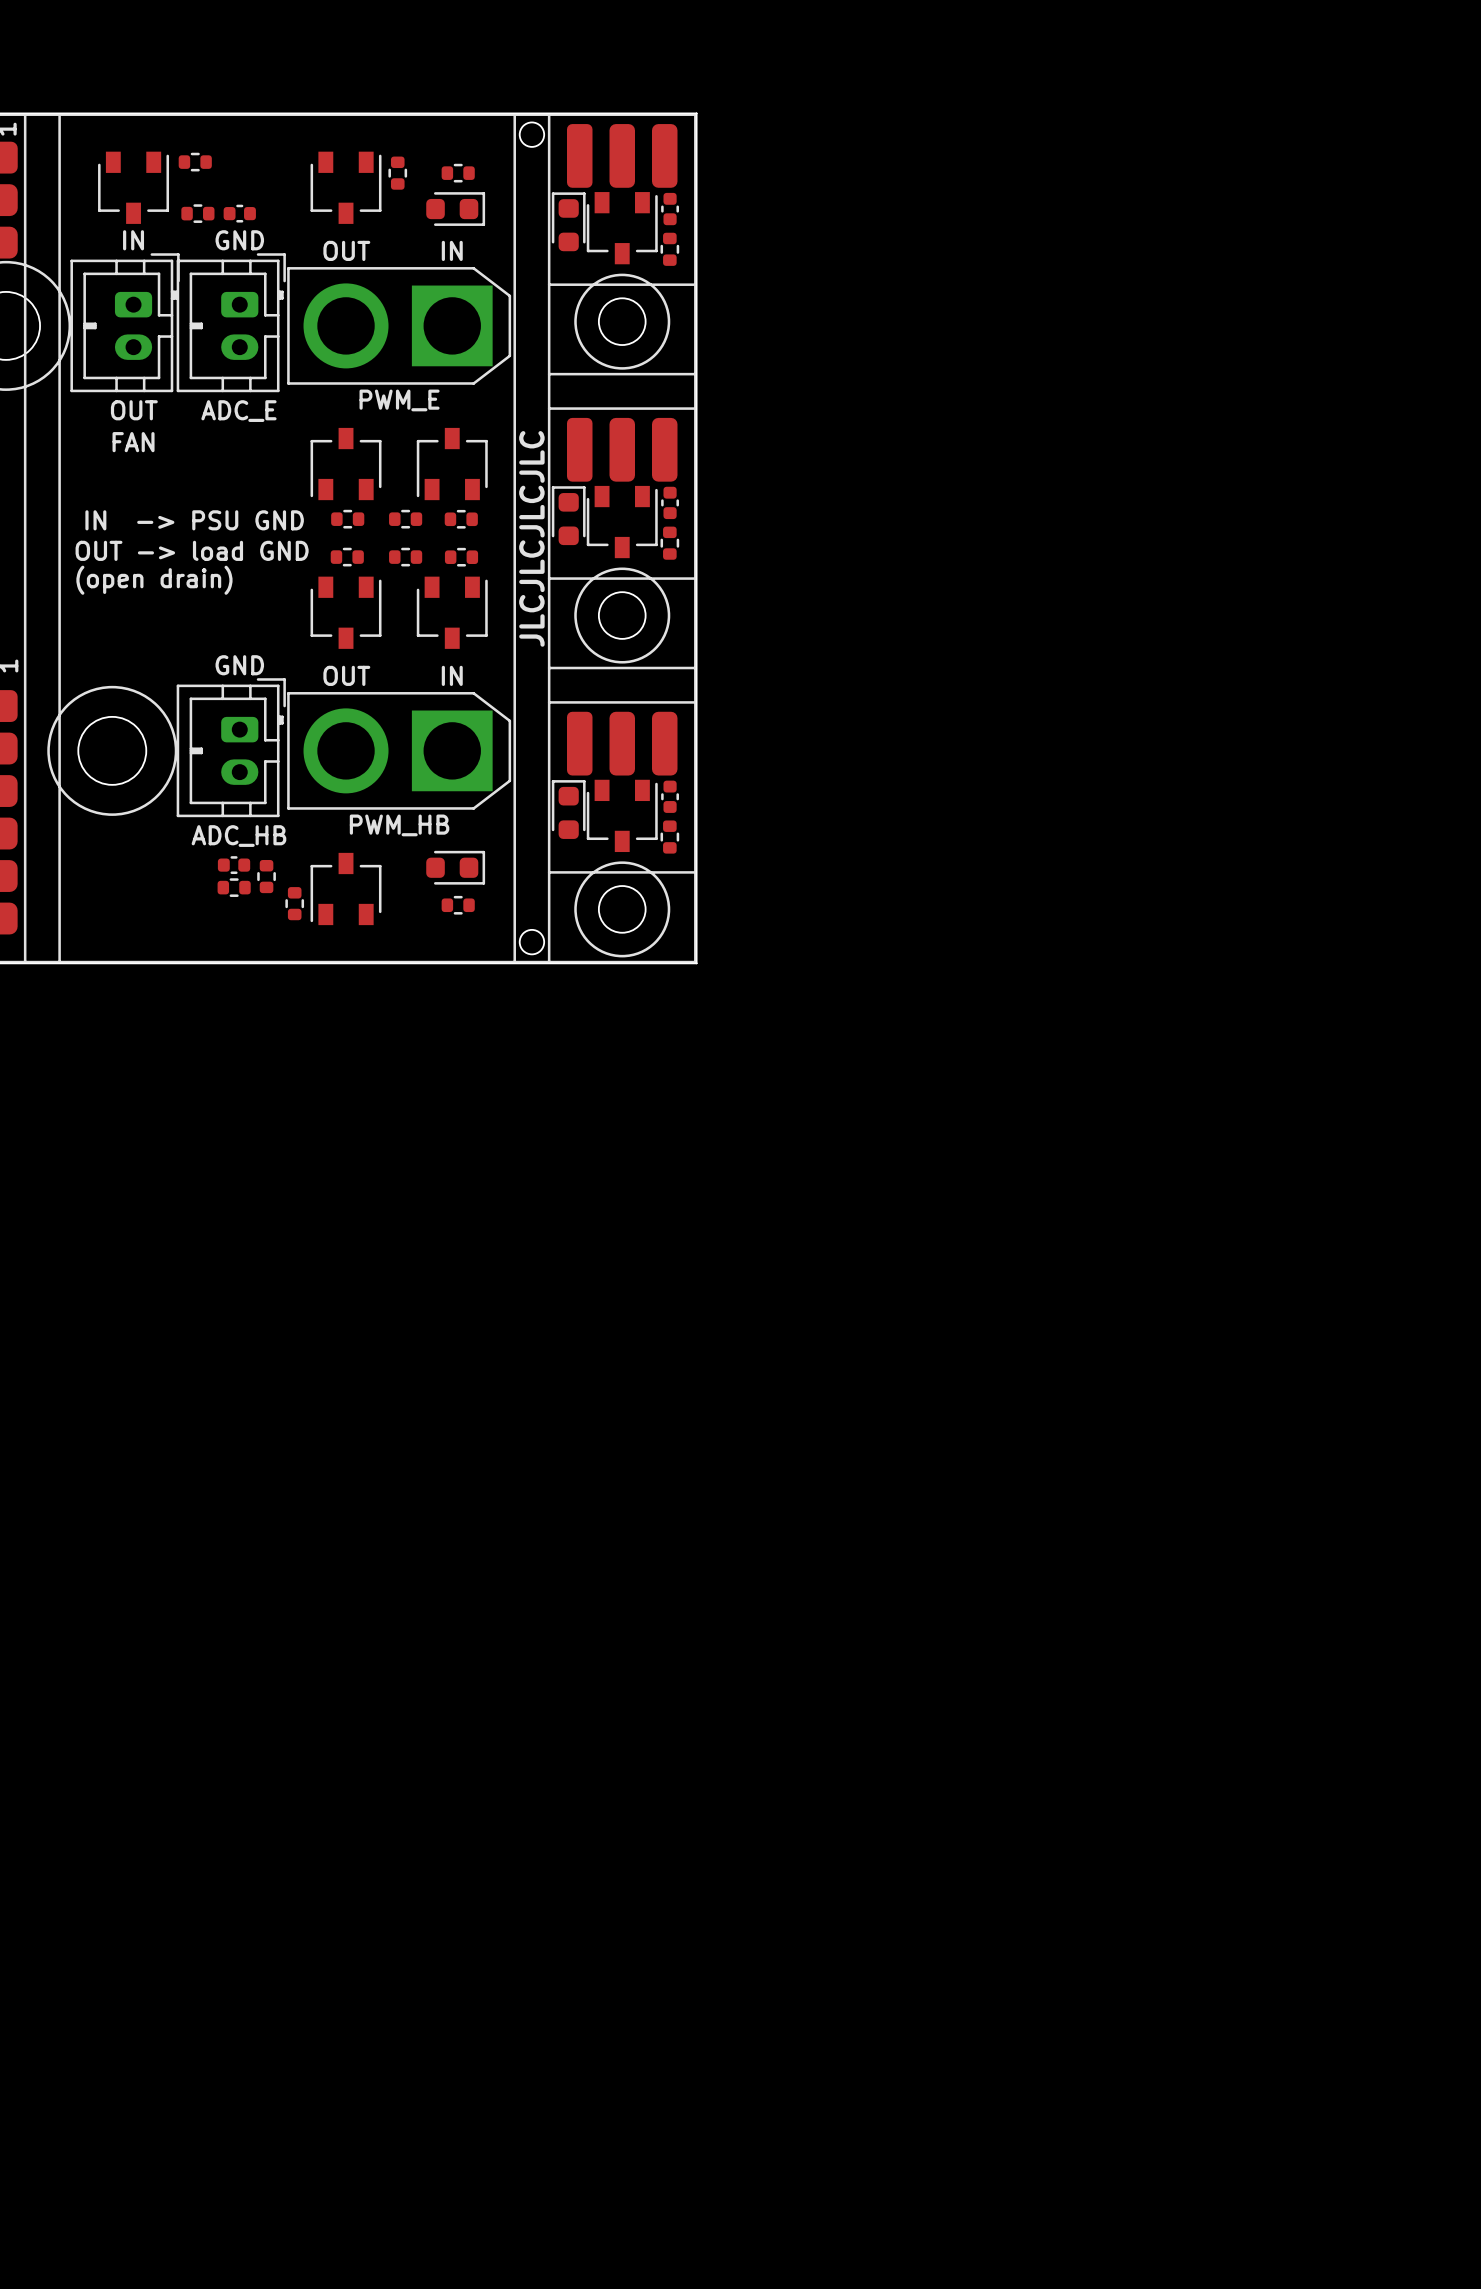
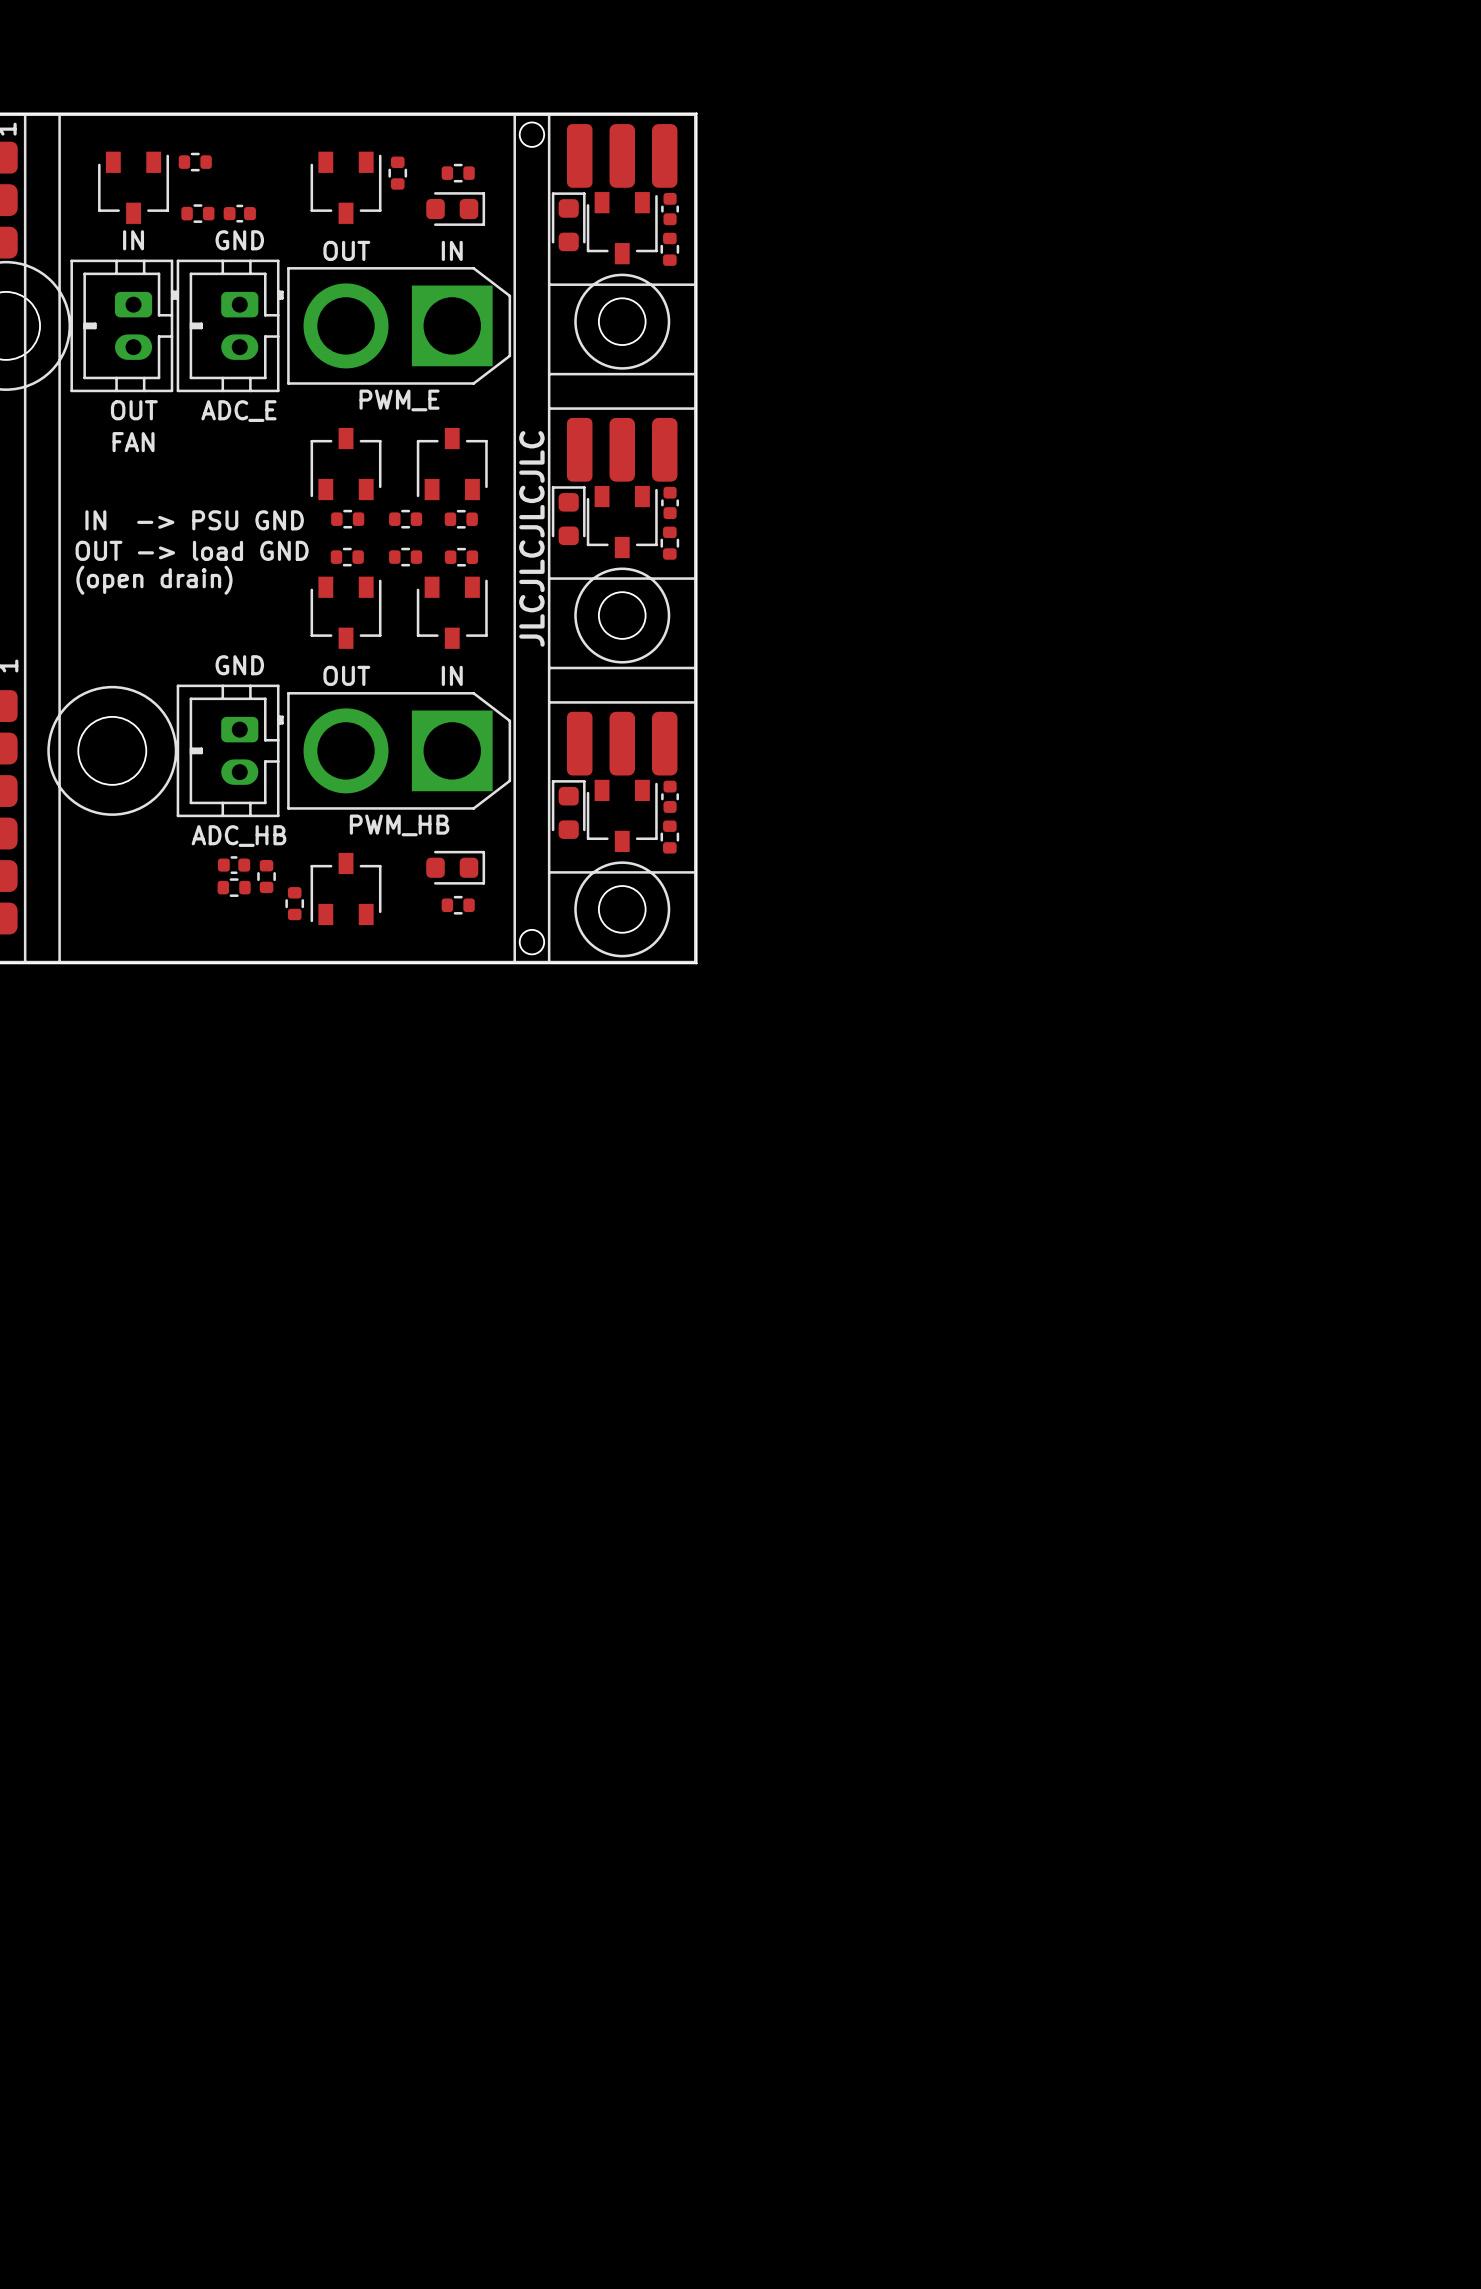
part footprint: [70, 253, 180, 393] -> [70, 259, 178, 393]
part footprint: [176, 253, 286, 393] -> [176, 259, 284, 393]
part footprint: [176, 678, 286, 818] -> [176, 684, 284, 818]

